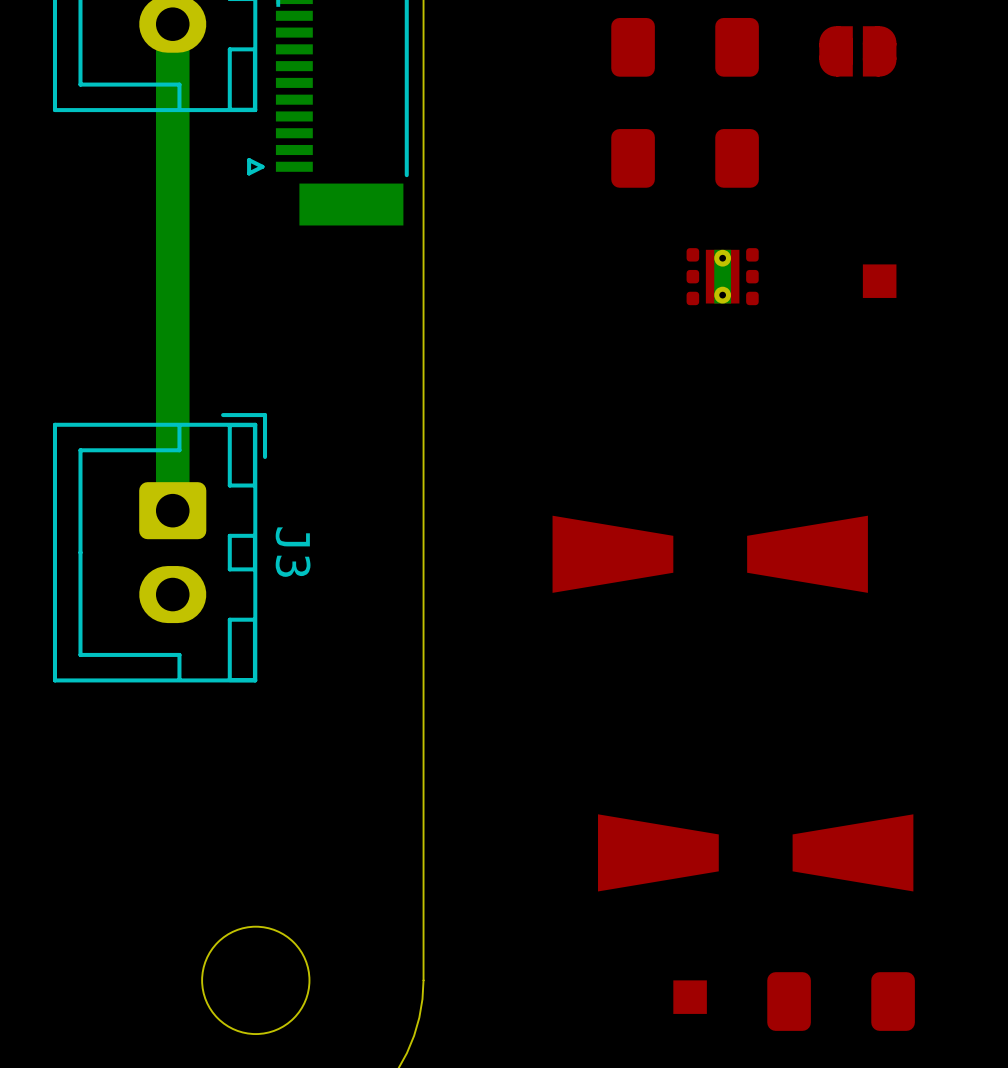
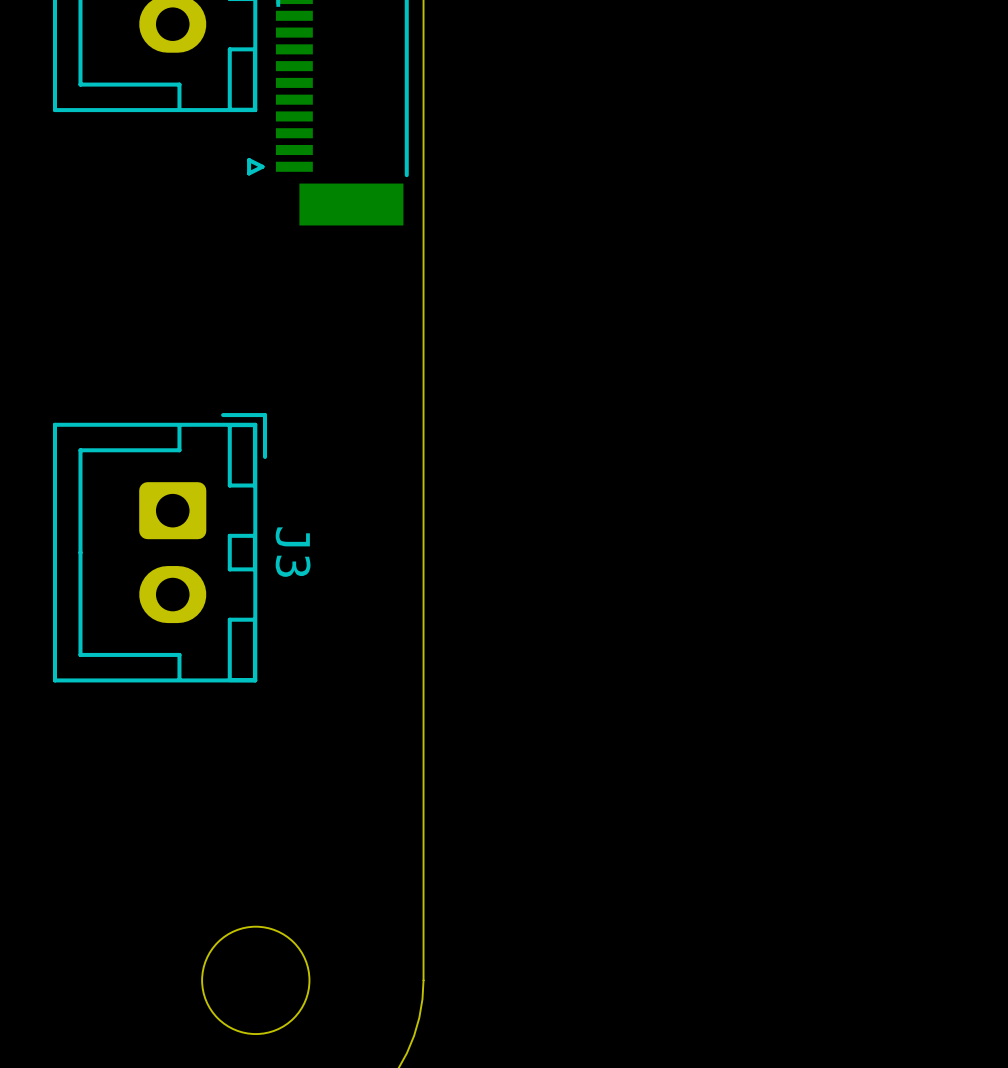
bottom track: (172, 24) (172, 510) -> none
part: (685, 47) -> none
part: (857, 51) -> none
part: (685, 158) -> none
part: (722, 276) -> none
part: (879, 281) -> none
part: (710, 554) -> none
part: (755, 852) -> none
part: (690, 997) -> none
part: (841, 1001) -> none

